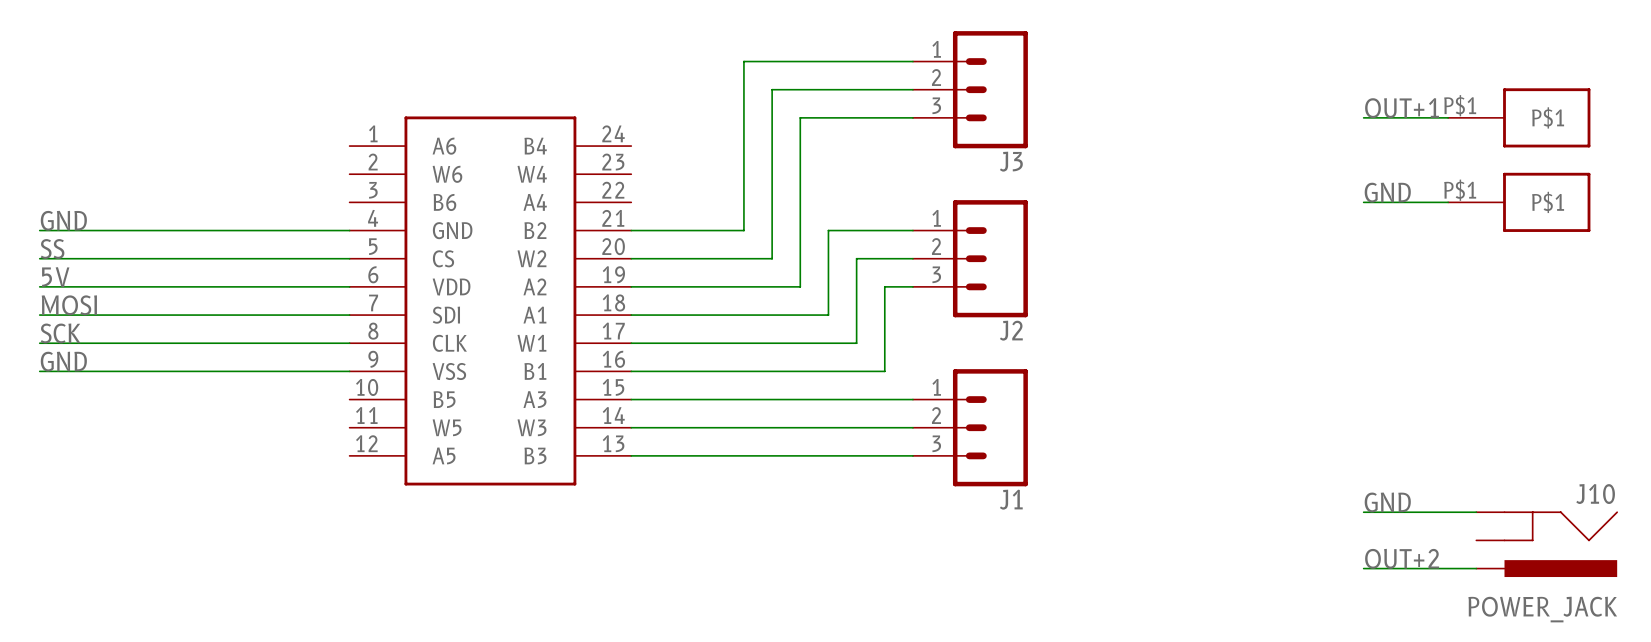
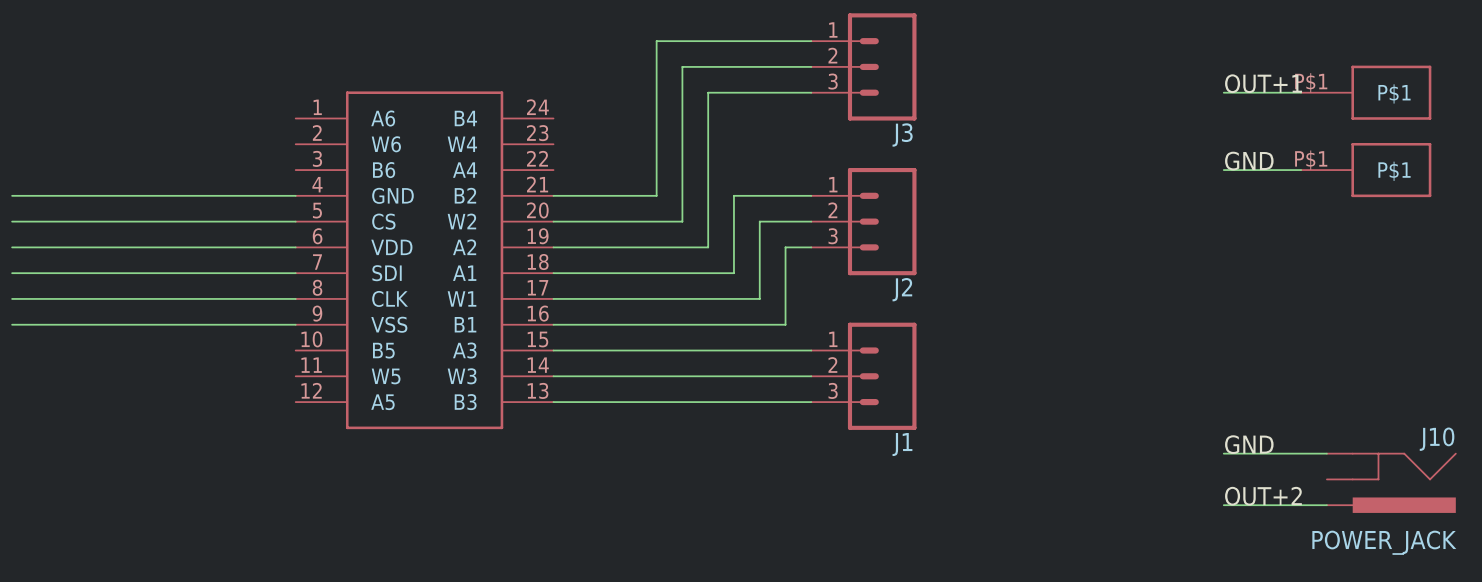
label: GND (63, 220) -> none
label: SS (52, 248) -> none
label: 5V (55, 277) -> none
label: MOSI (69, 305) -> none
label: SCK (60, 333) -> none
label: GND (63, 361) -> none

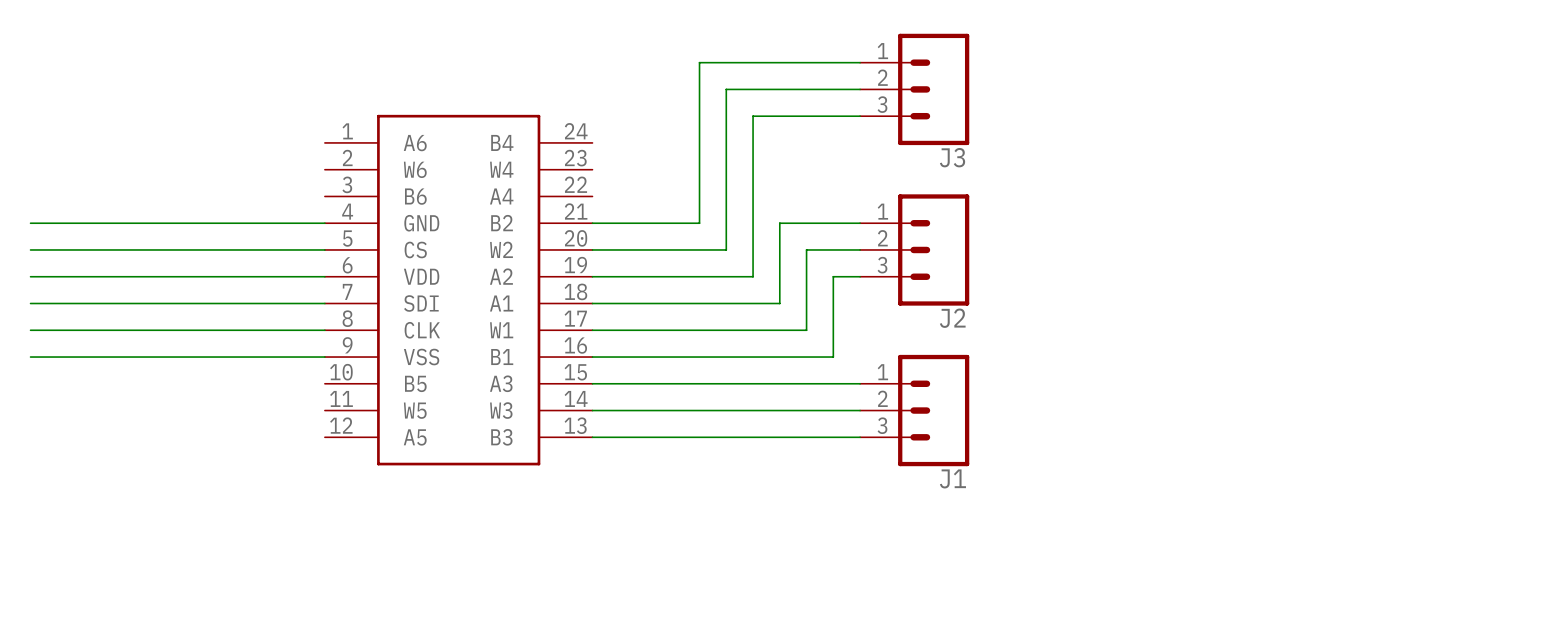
label: OUT+1 (1263, 83) -> none
wire: (1223, 92) (1301, 92) -> none
part: (1366, 92) -> none
label: GND (1249, 161) -> none
wire: (1223, 170) (1301, 170) -> none
part: (1366, 170) -> none
label: GND (1249, 444) -> none
wire: (1223, 453) (1326, 453) -> none
J10: POWER_JACK (1391, 482) -> none
label: OUT+2 (1263, 496) -> none
wire: (1223, 505) (1326, 505) -> none

